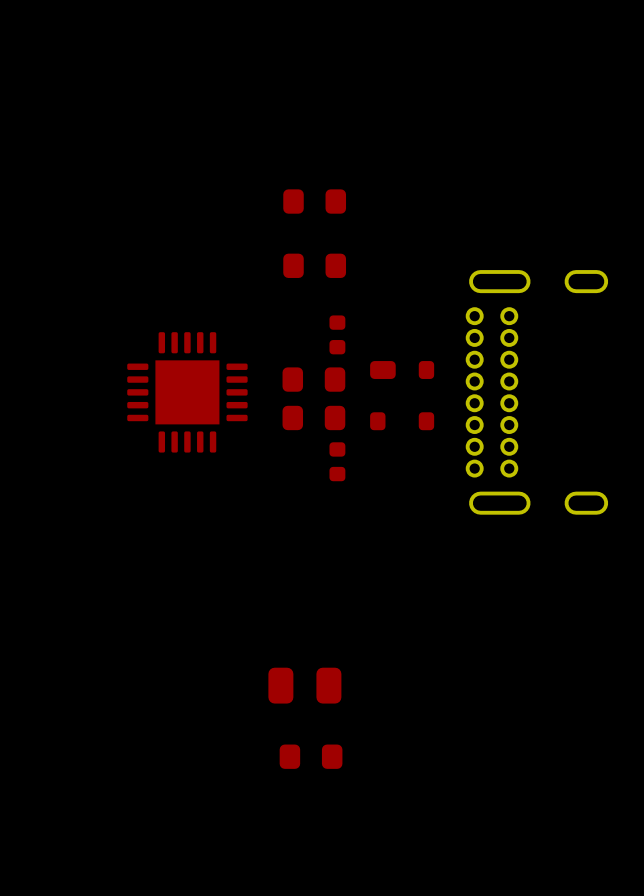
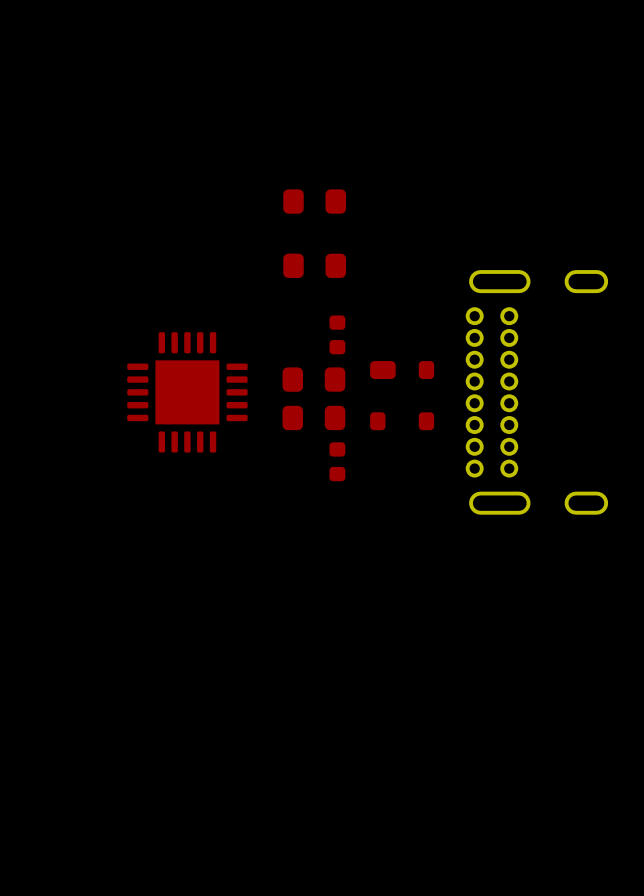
part: (304, 685) -> none
part: (311, 756) -> none

